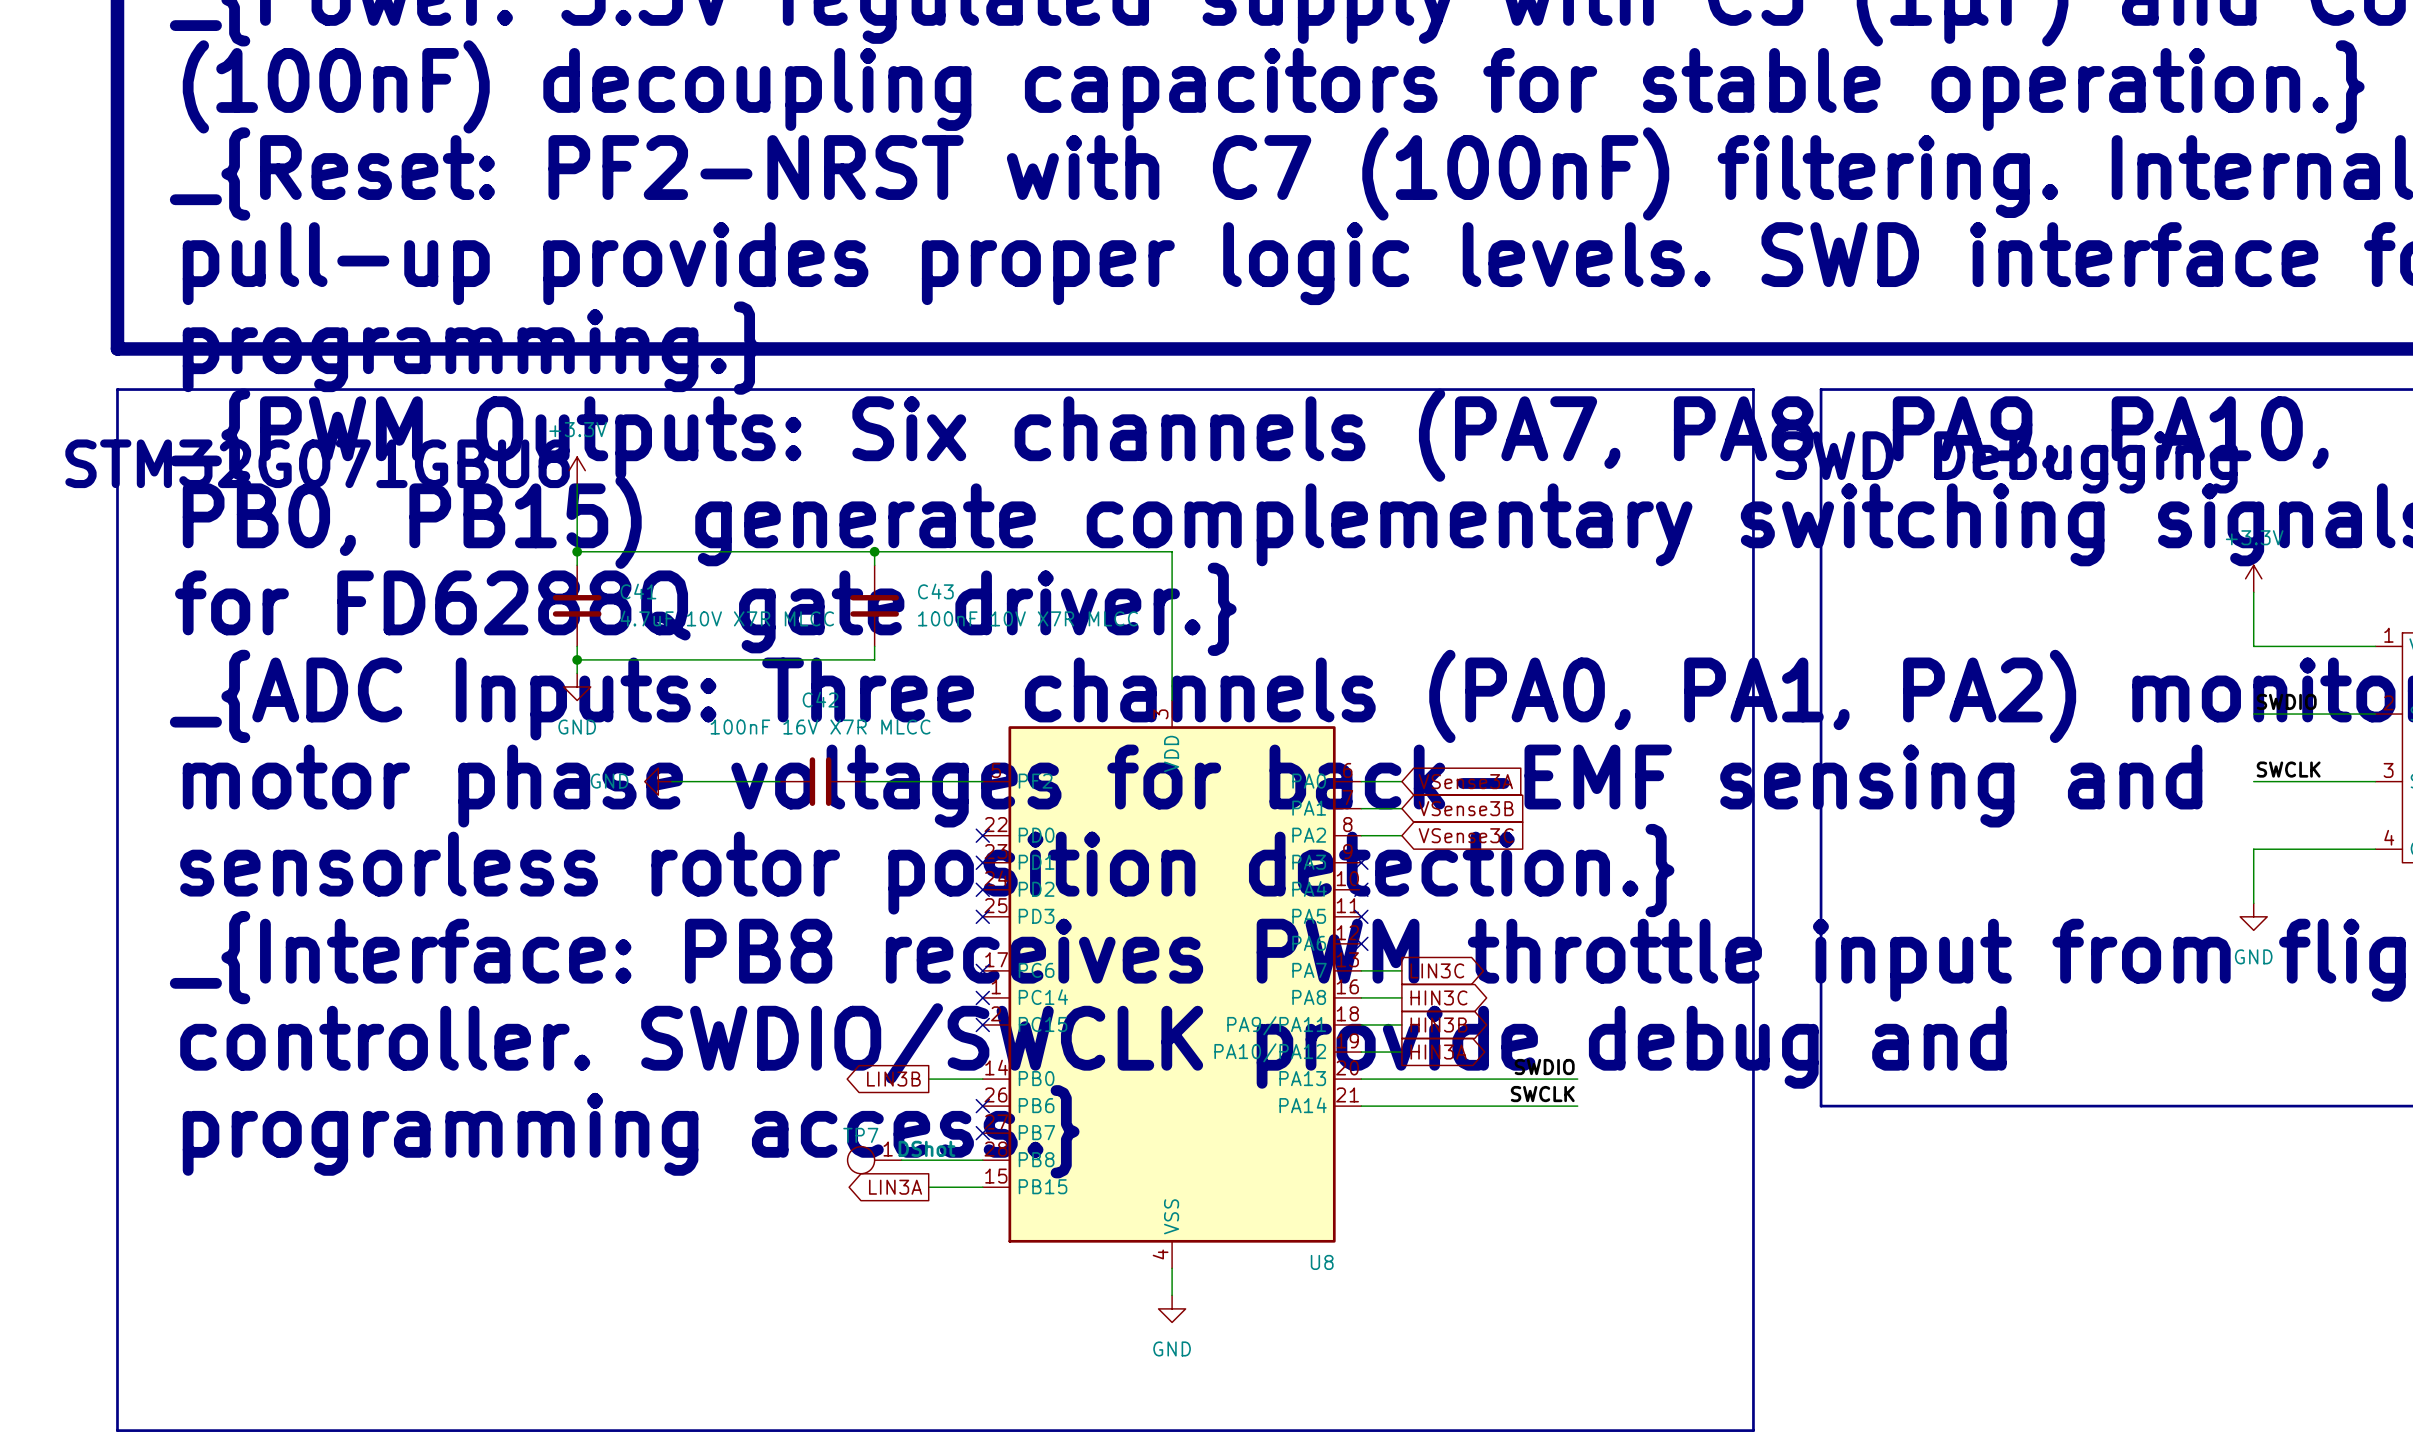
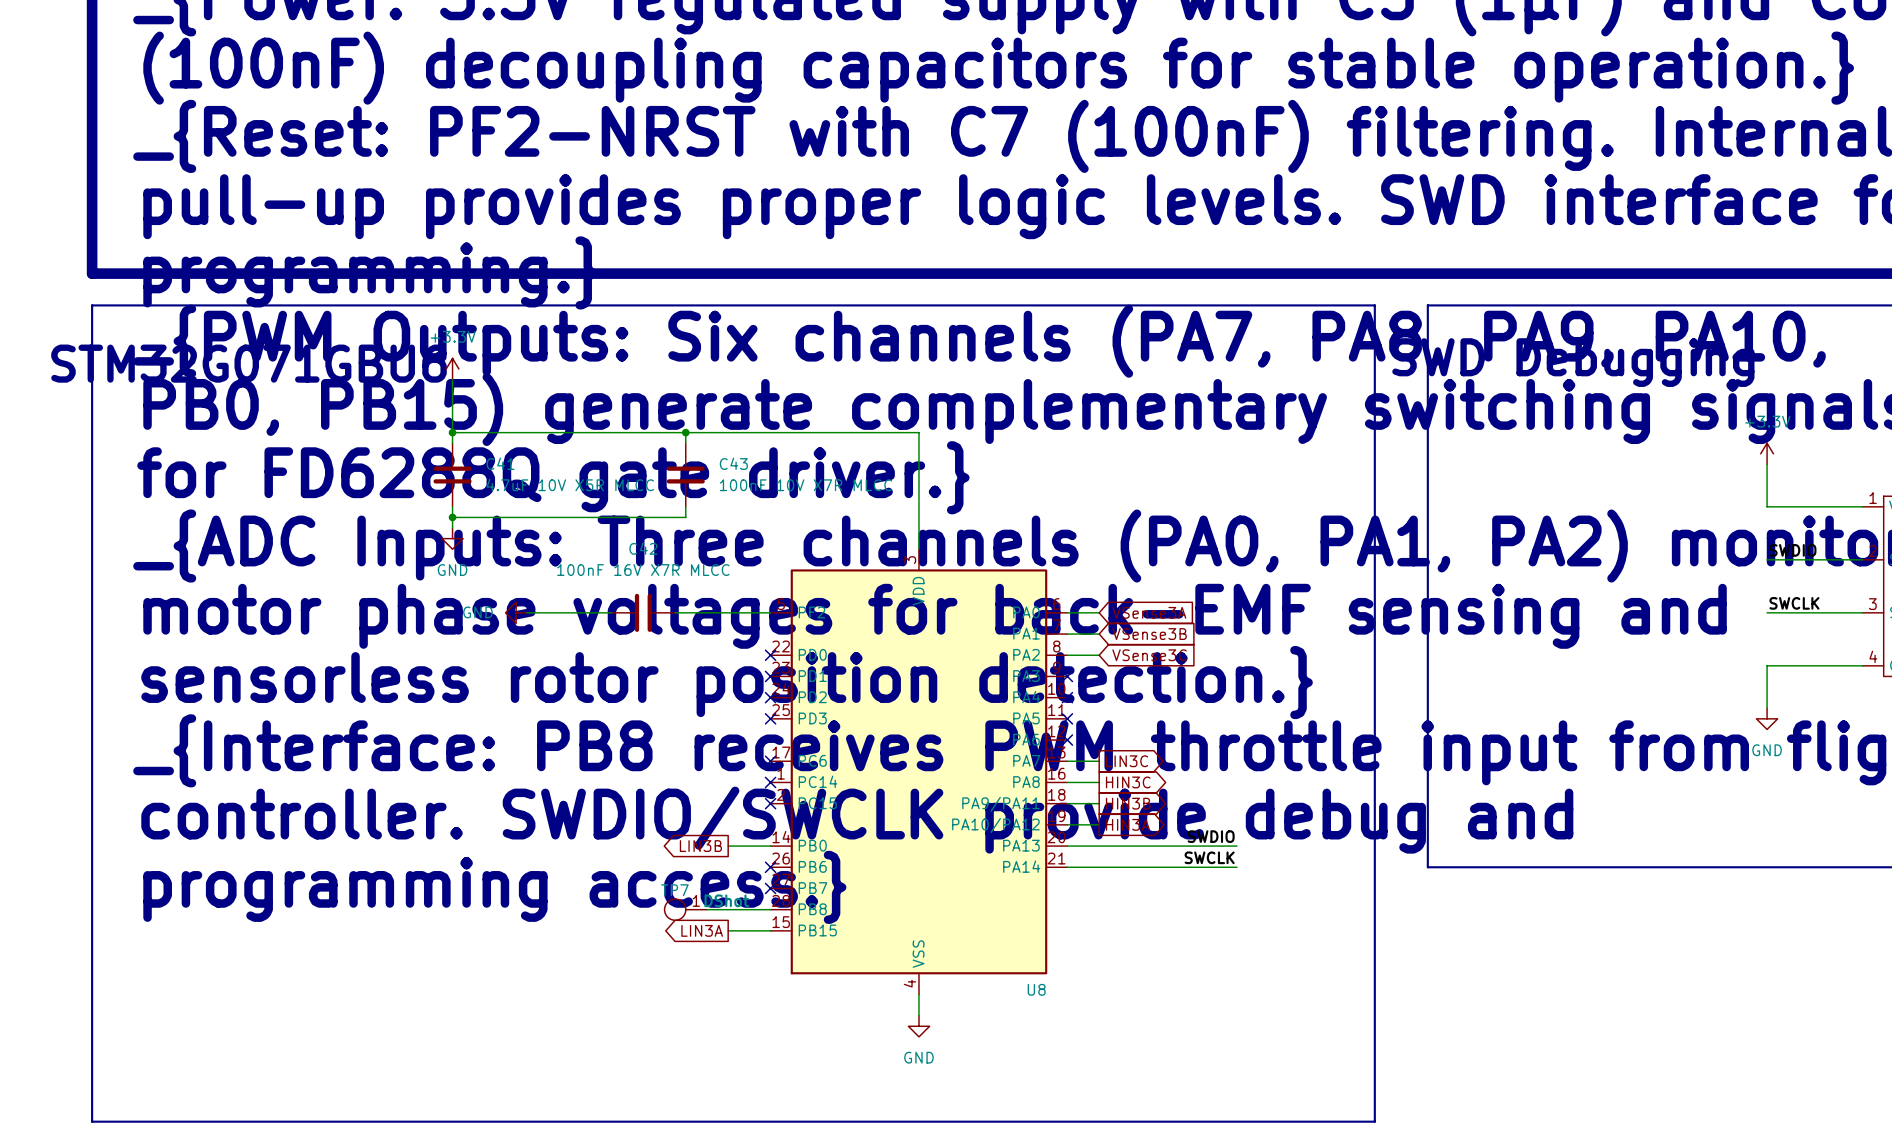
C41 value: 4.7uF 10V X7R MLCC (727, 618) -> 4.7uF 10V X5R MLCC (570, 484)

